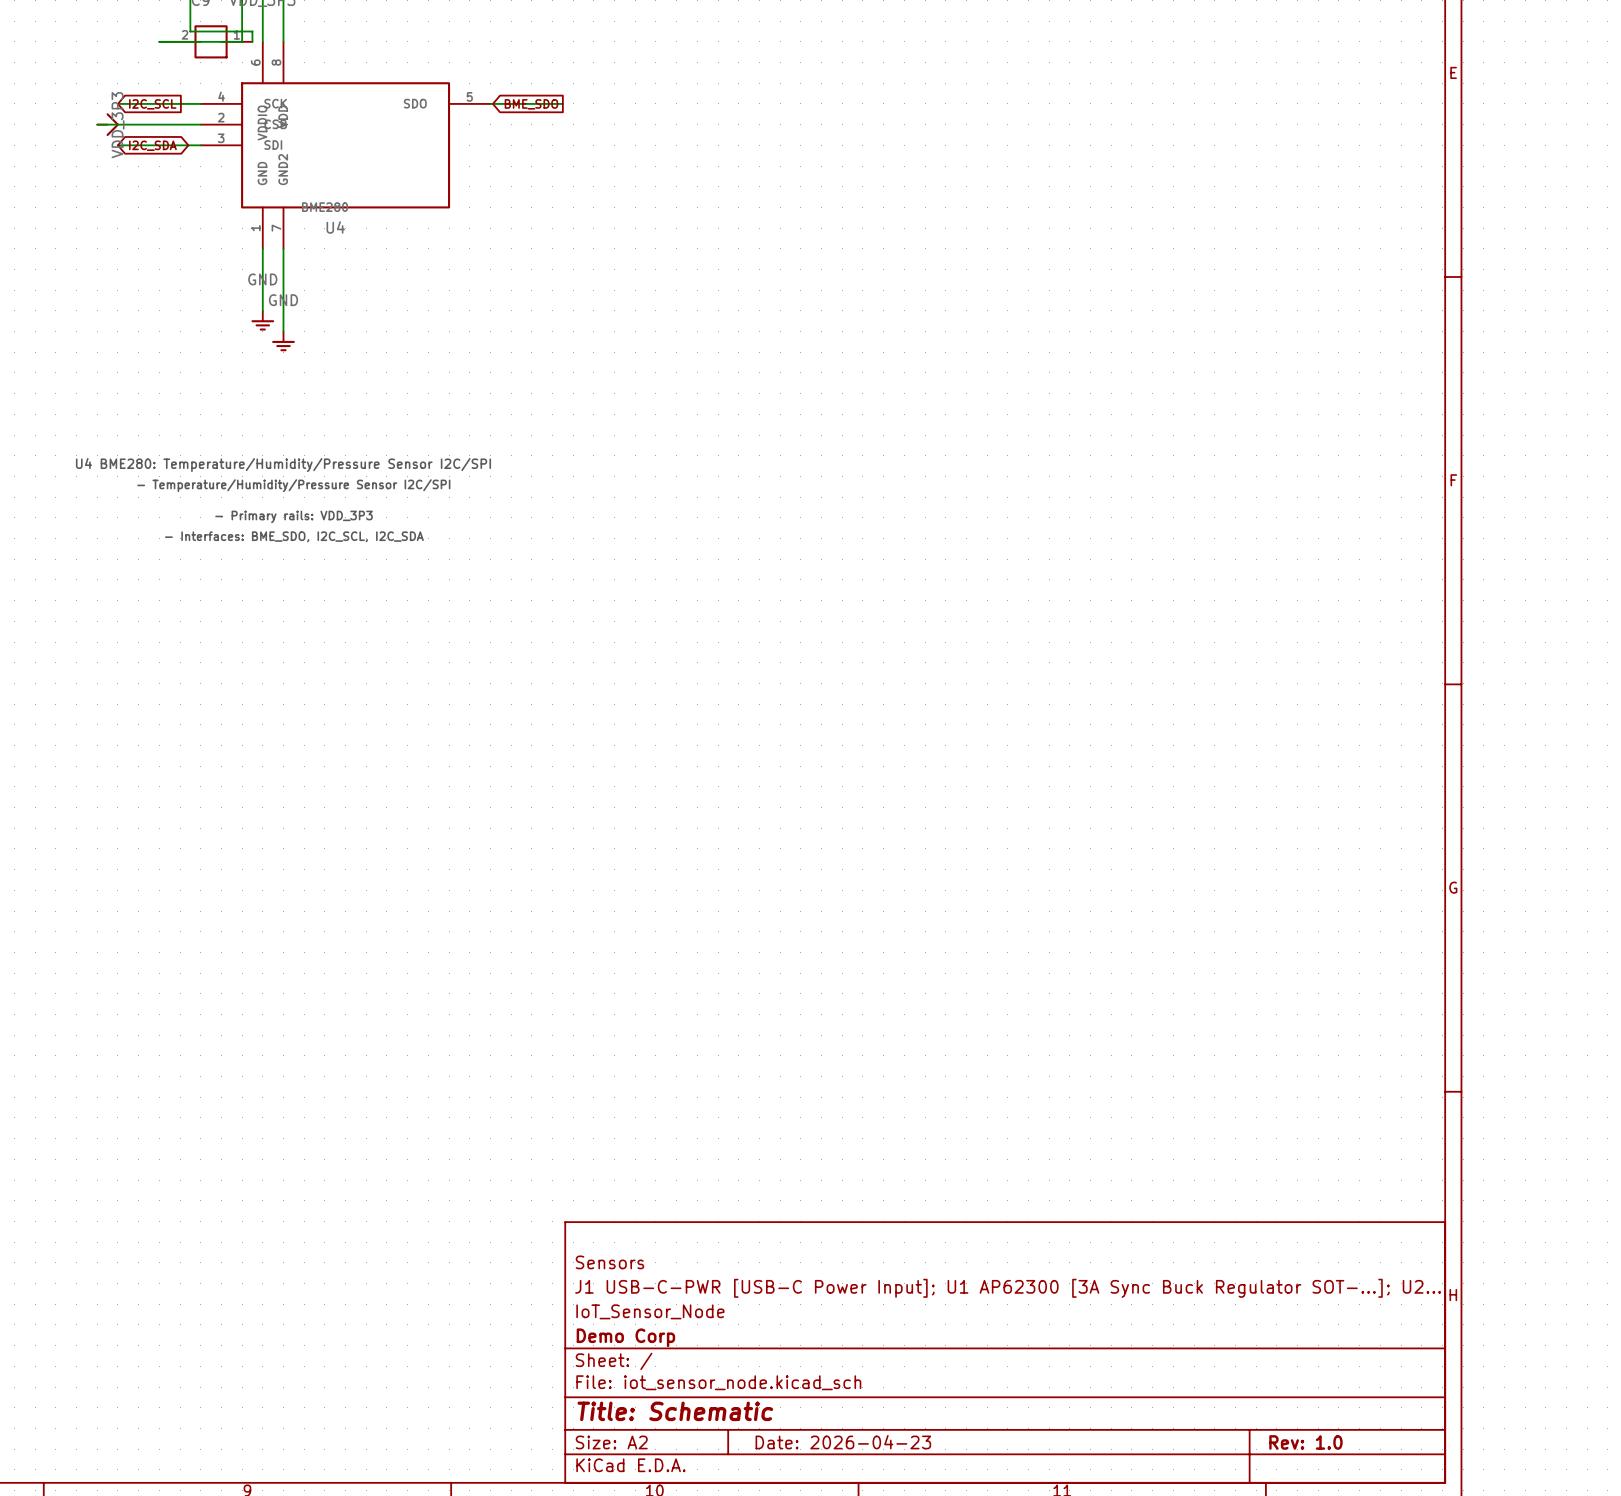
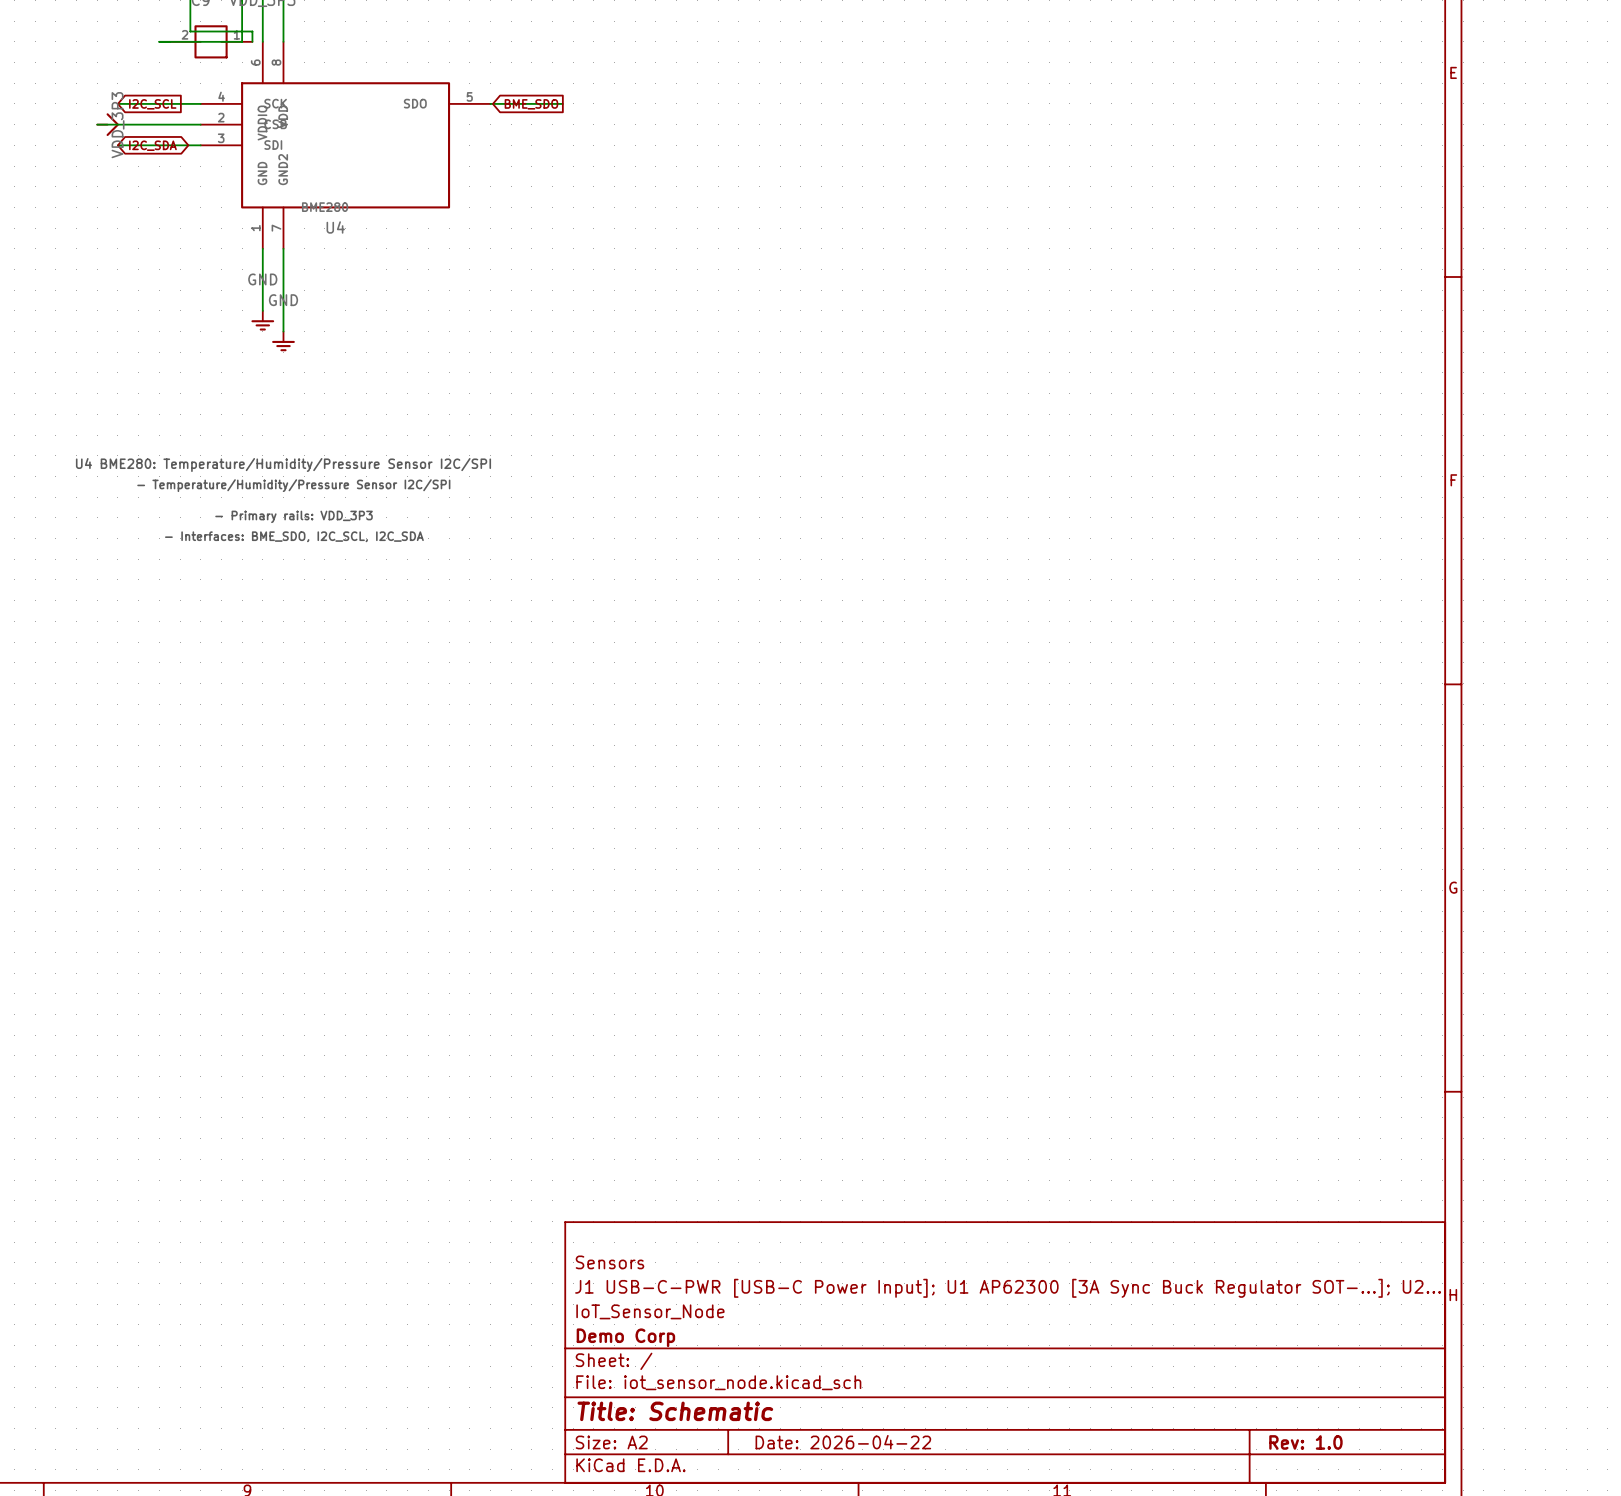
title block: Date: 2026-04-23 (843, 1442) -> Date: 2026-04-22 (843, 1442)

